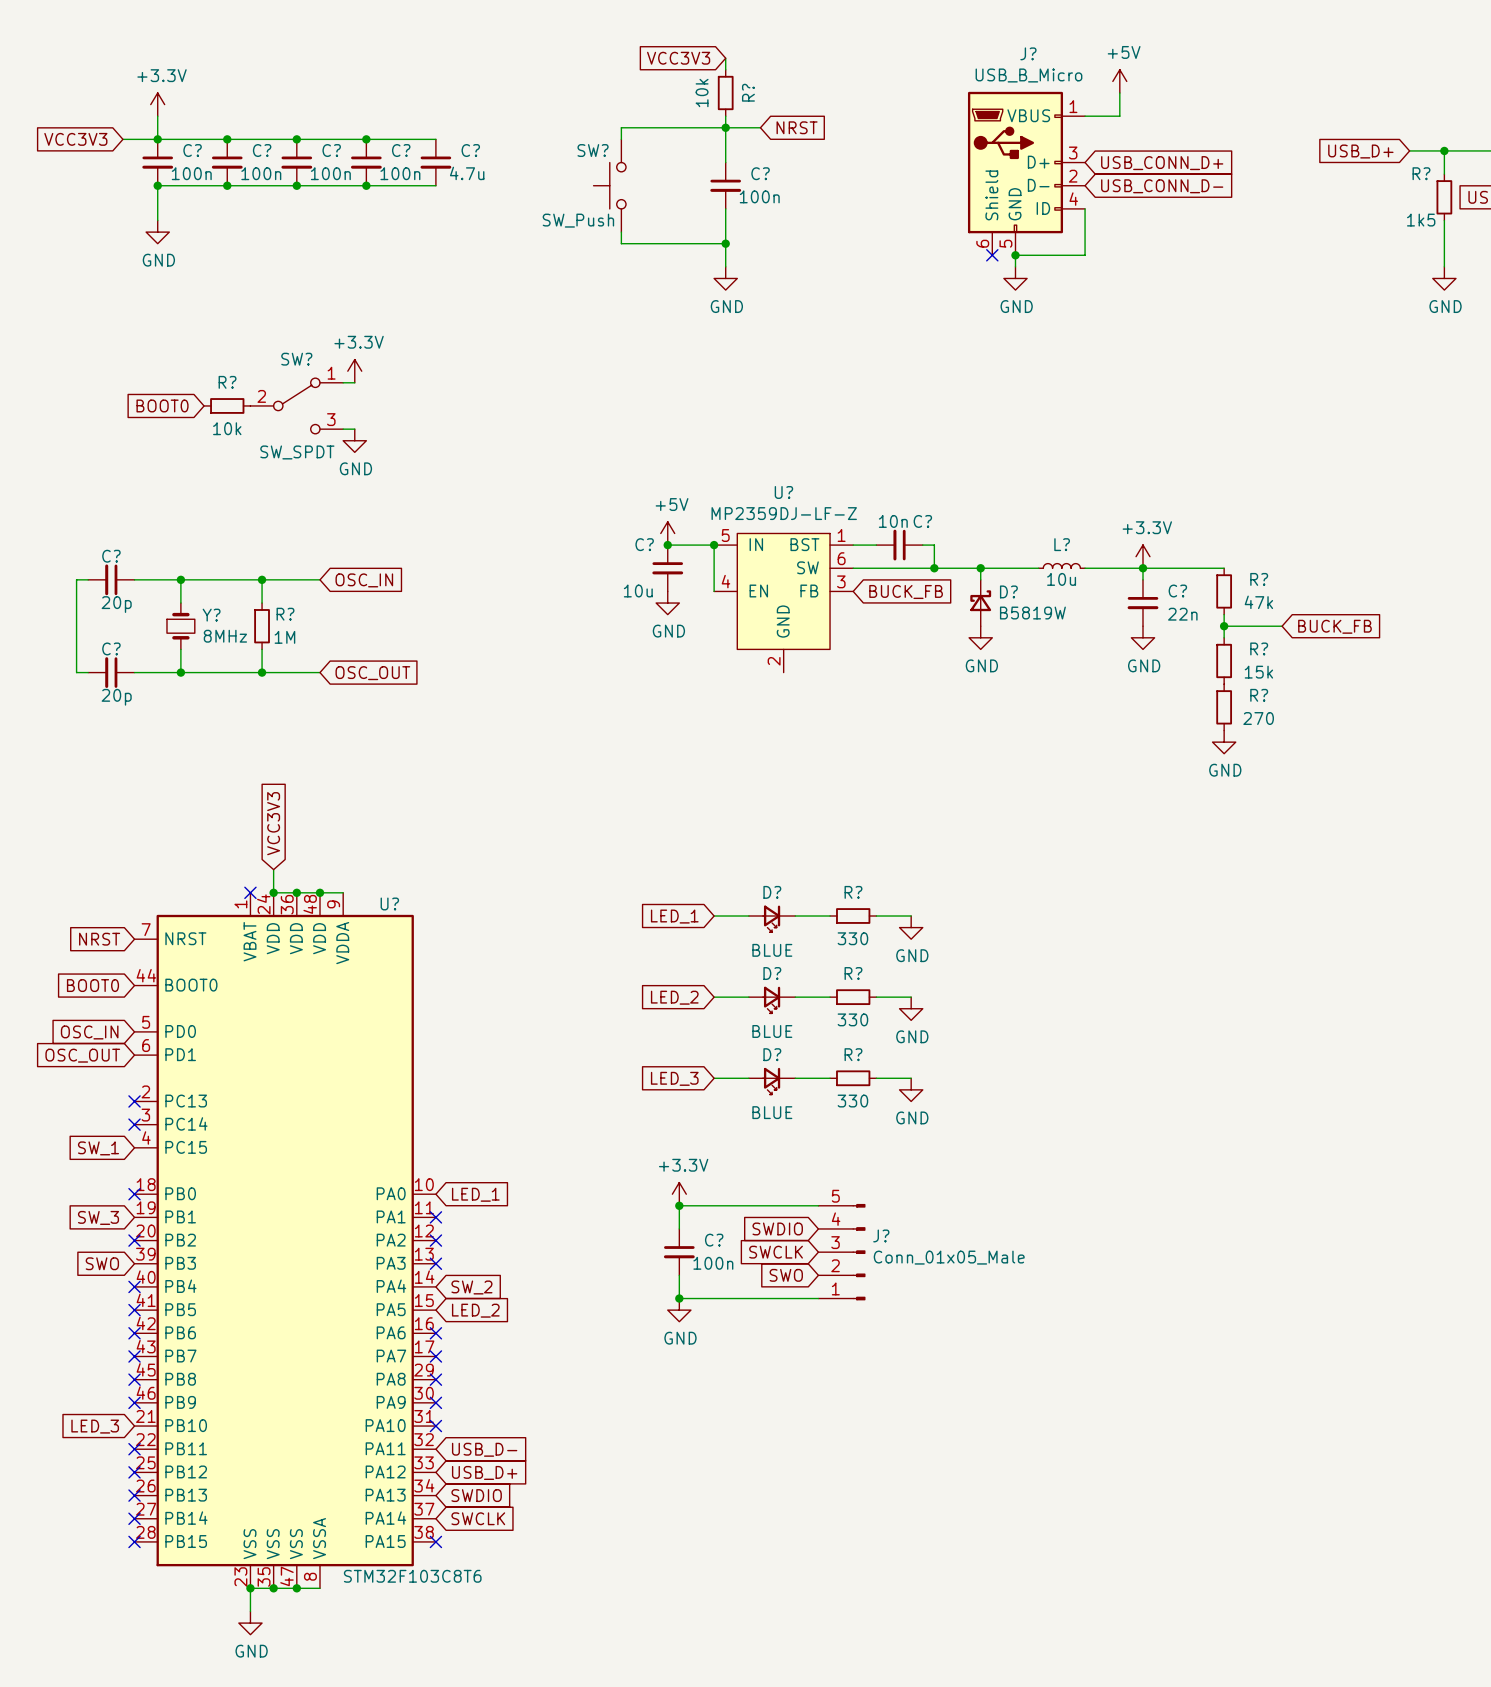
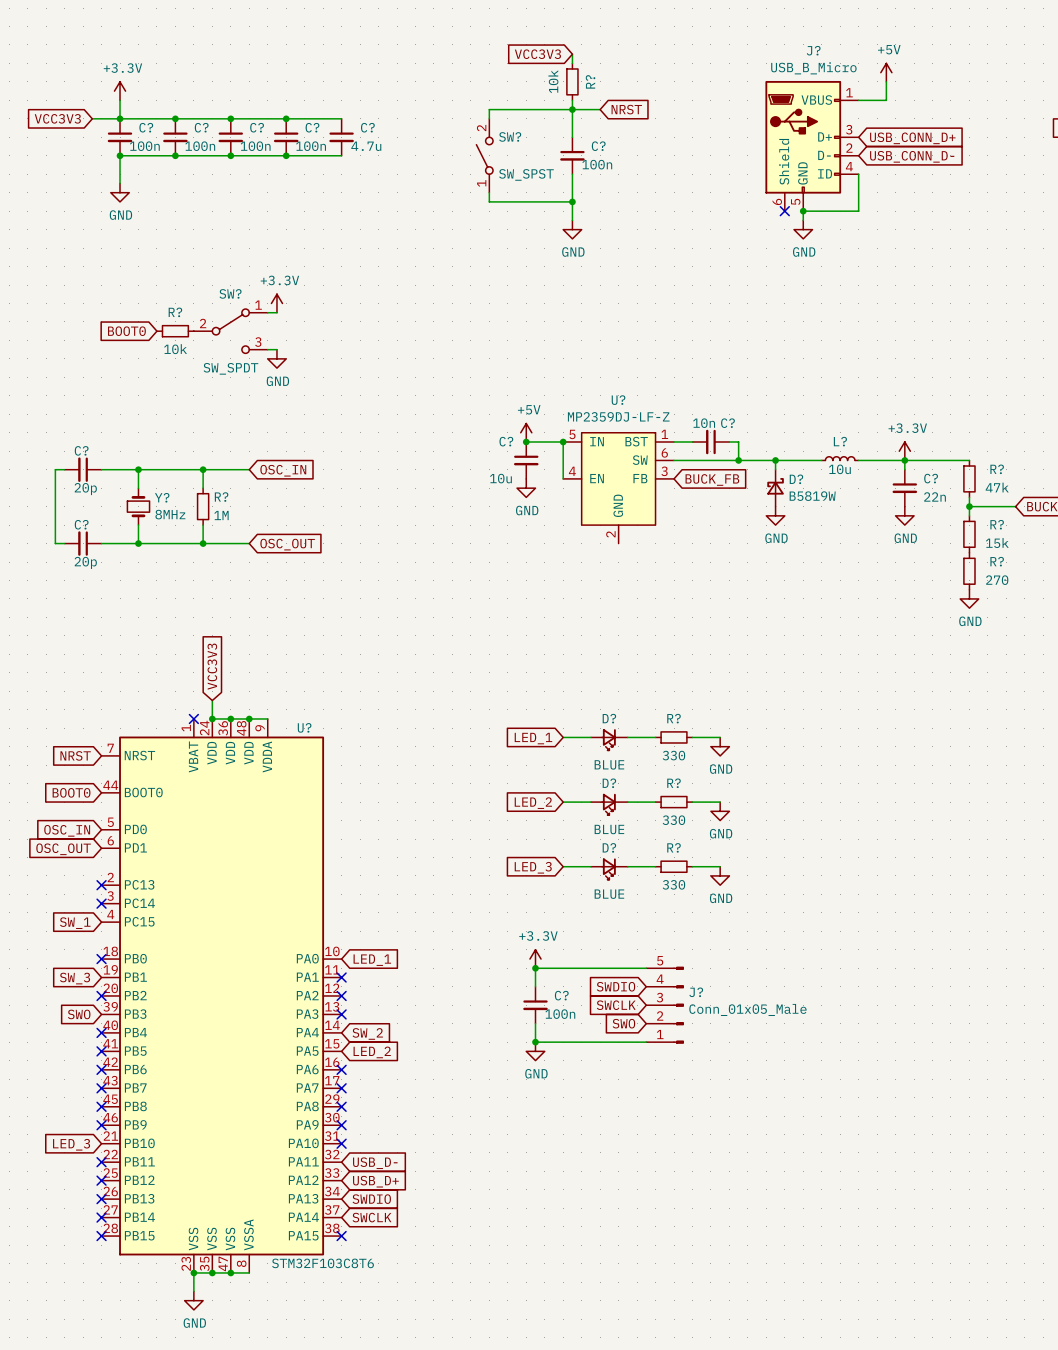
SW? symbol: [593, 139, 627, 233] -> [476, 118, 494, 193]
SW? name position: SW? (593, 150) -> SW? (510, 136)
SW? value: SW_Push (578, 220) -> SW_SPST (526, 174)

